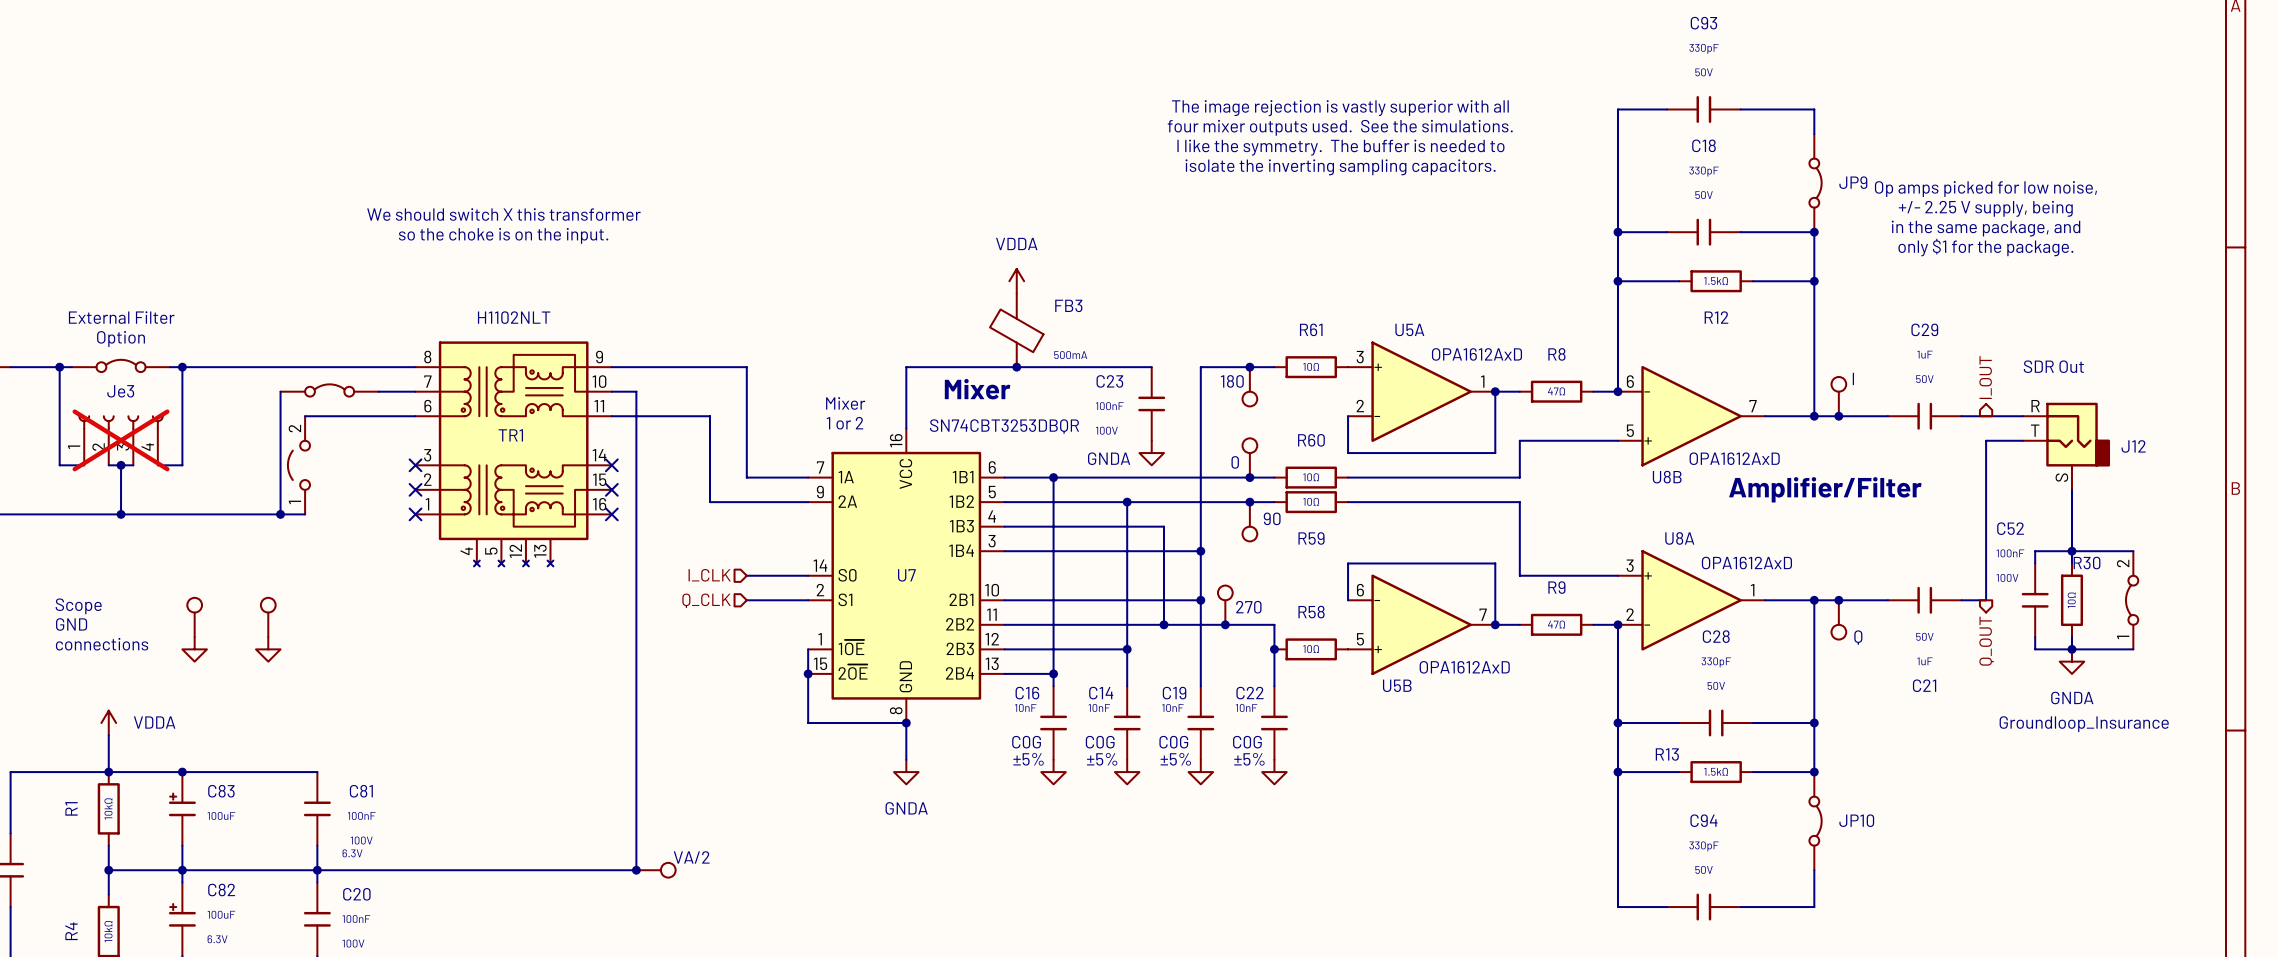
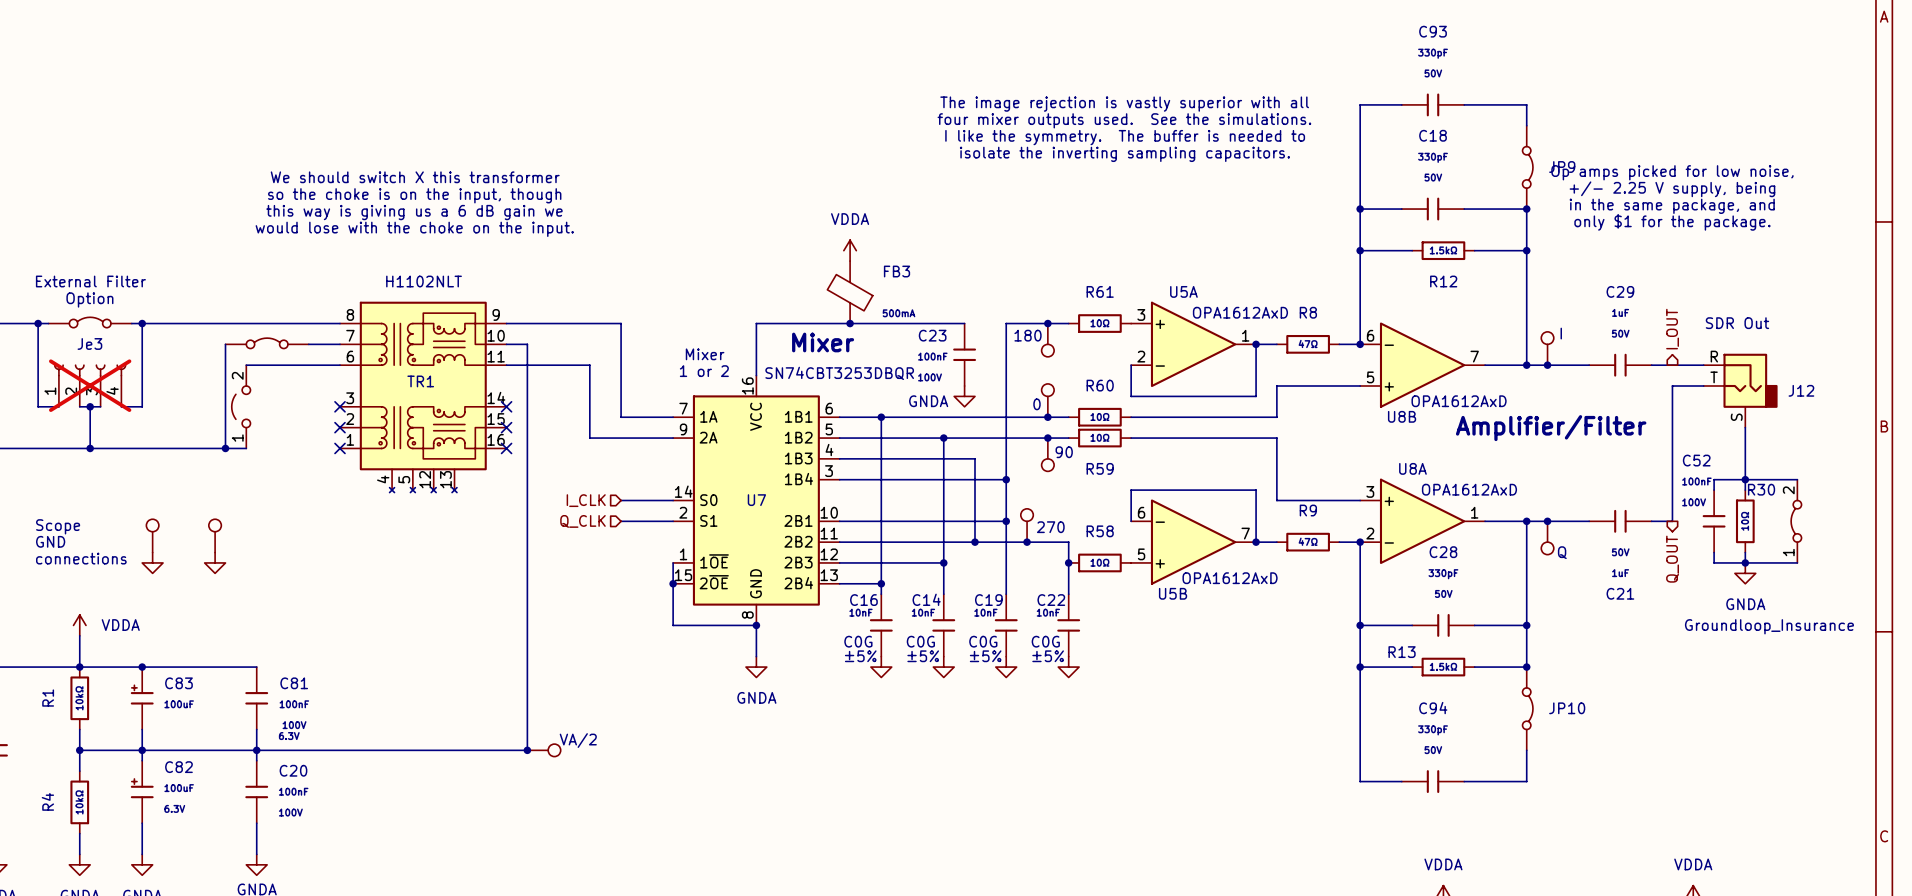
text: none -> We should switch X this transformer (415, 177)
text: We should switch X this transformer (503, 214) -> so the choke is on the input, though (414, 195)
text: so the choke is on the input. (503, 235) -> this way is giving us a 6 dB gain we (414, 212)
text: none -> would lose with the choke on the input. (414, 229)

